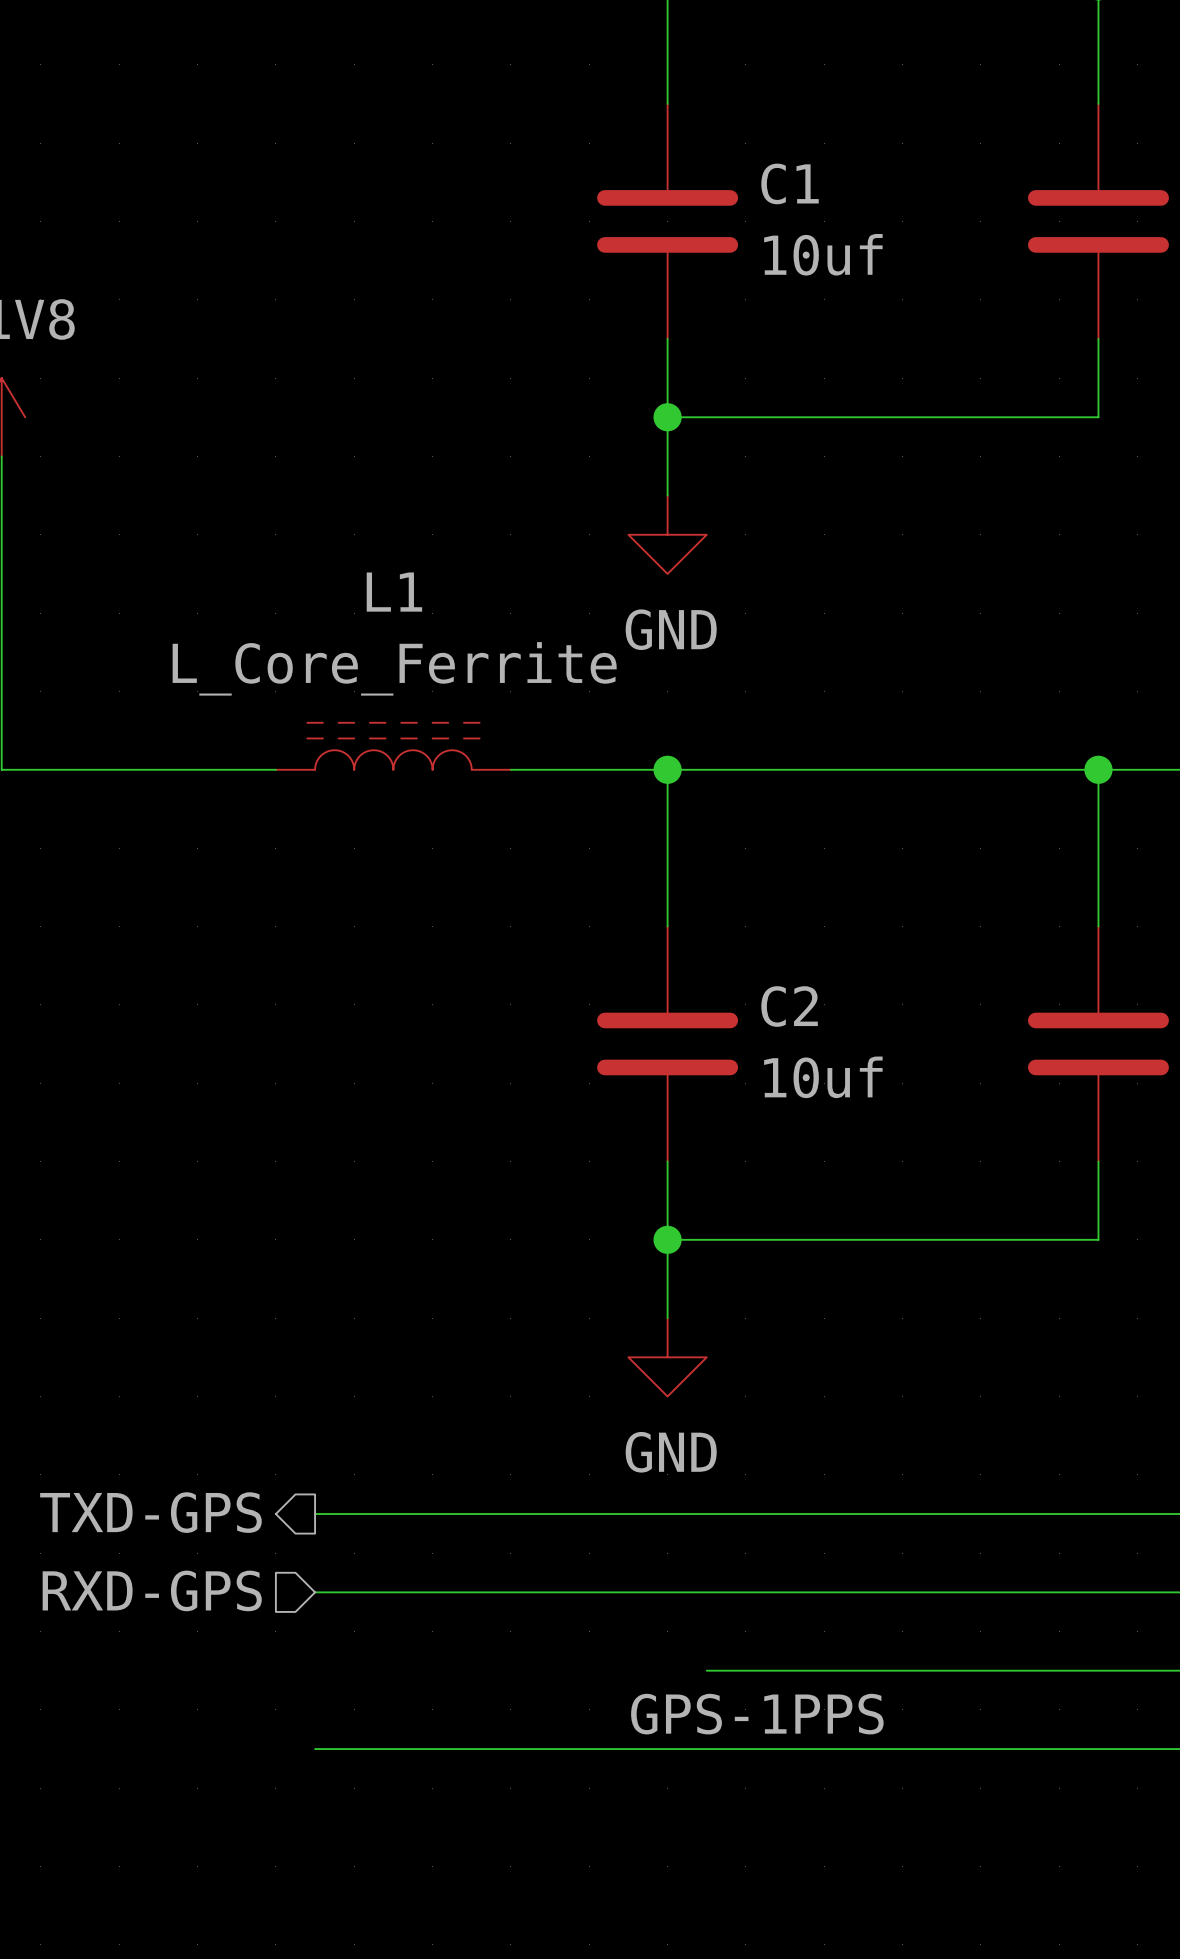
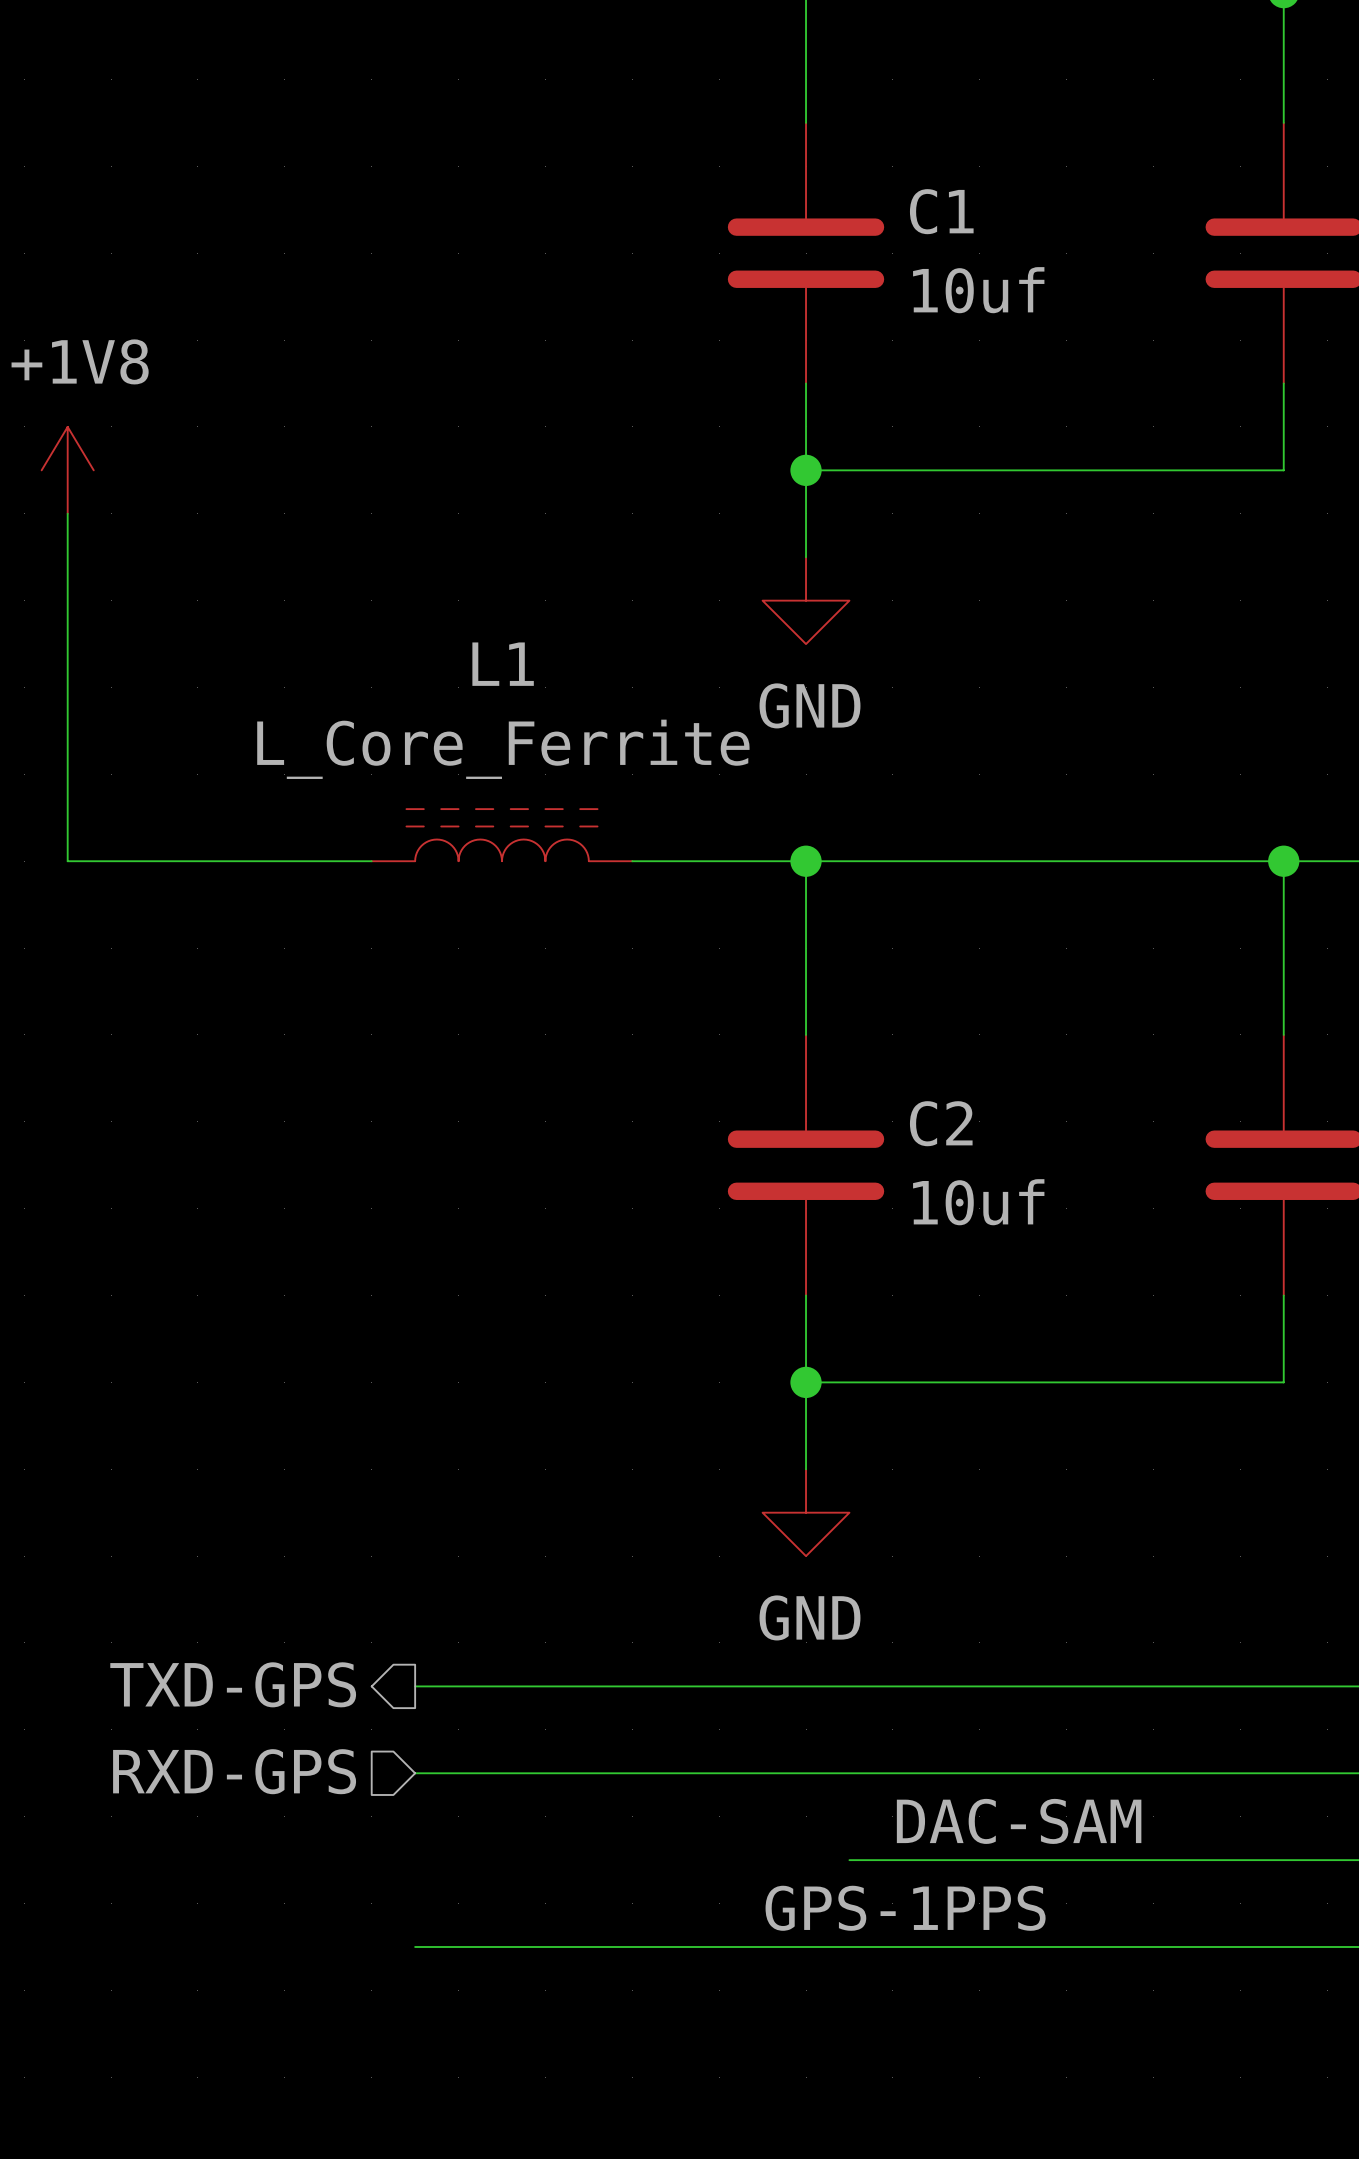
label: none -> DAC-SAM (1019, 1821)

